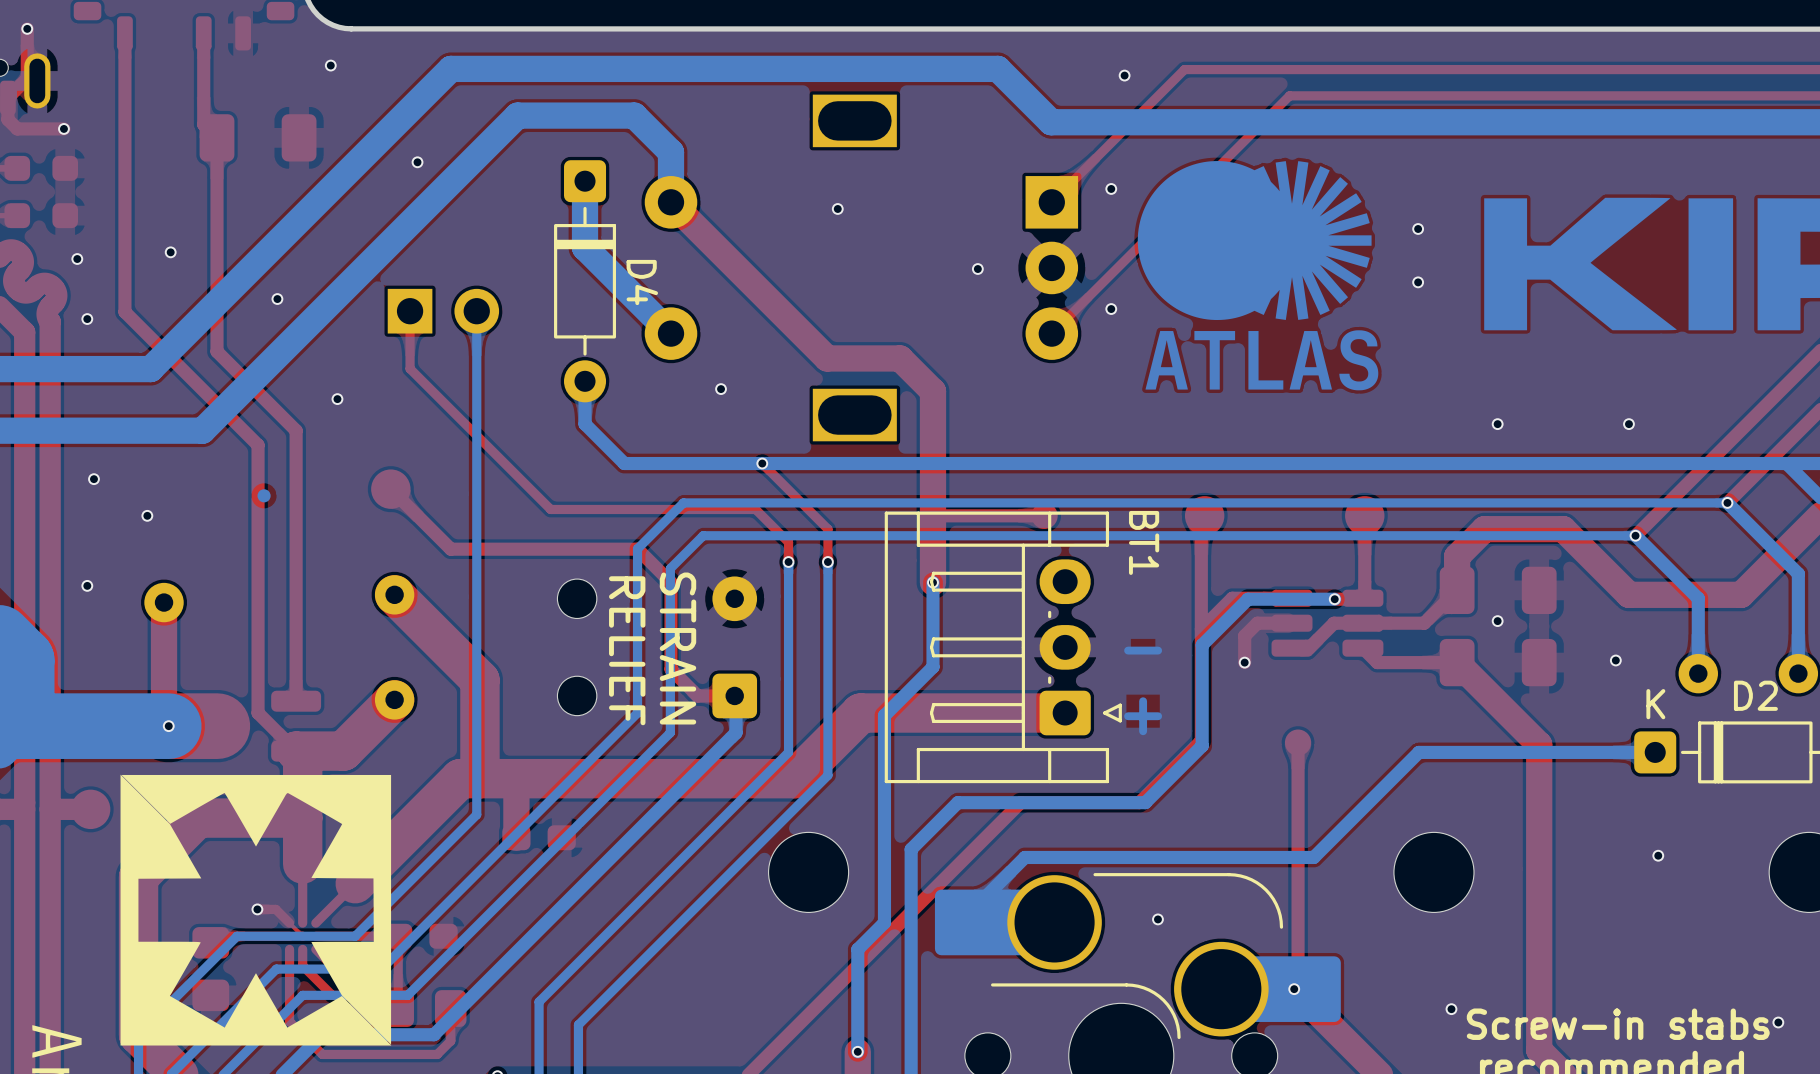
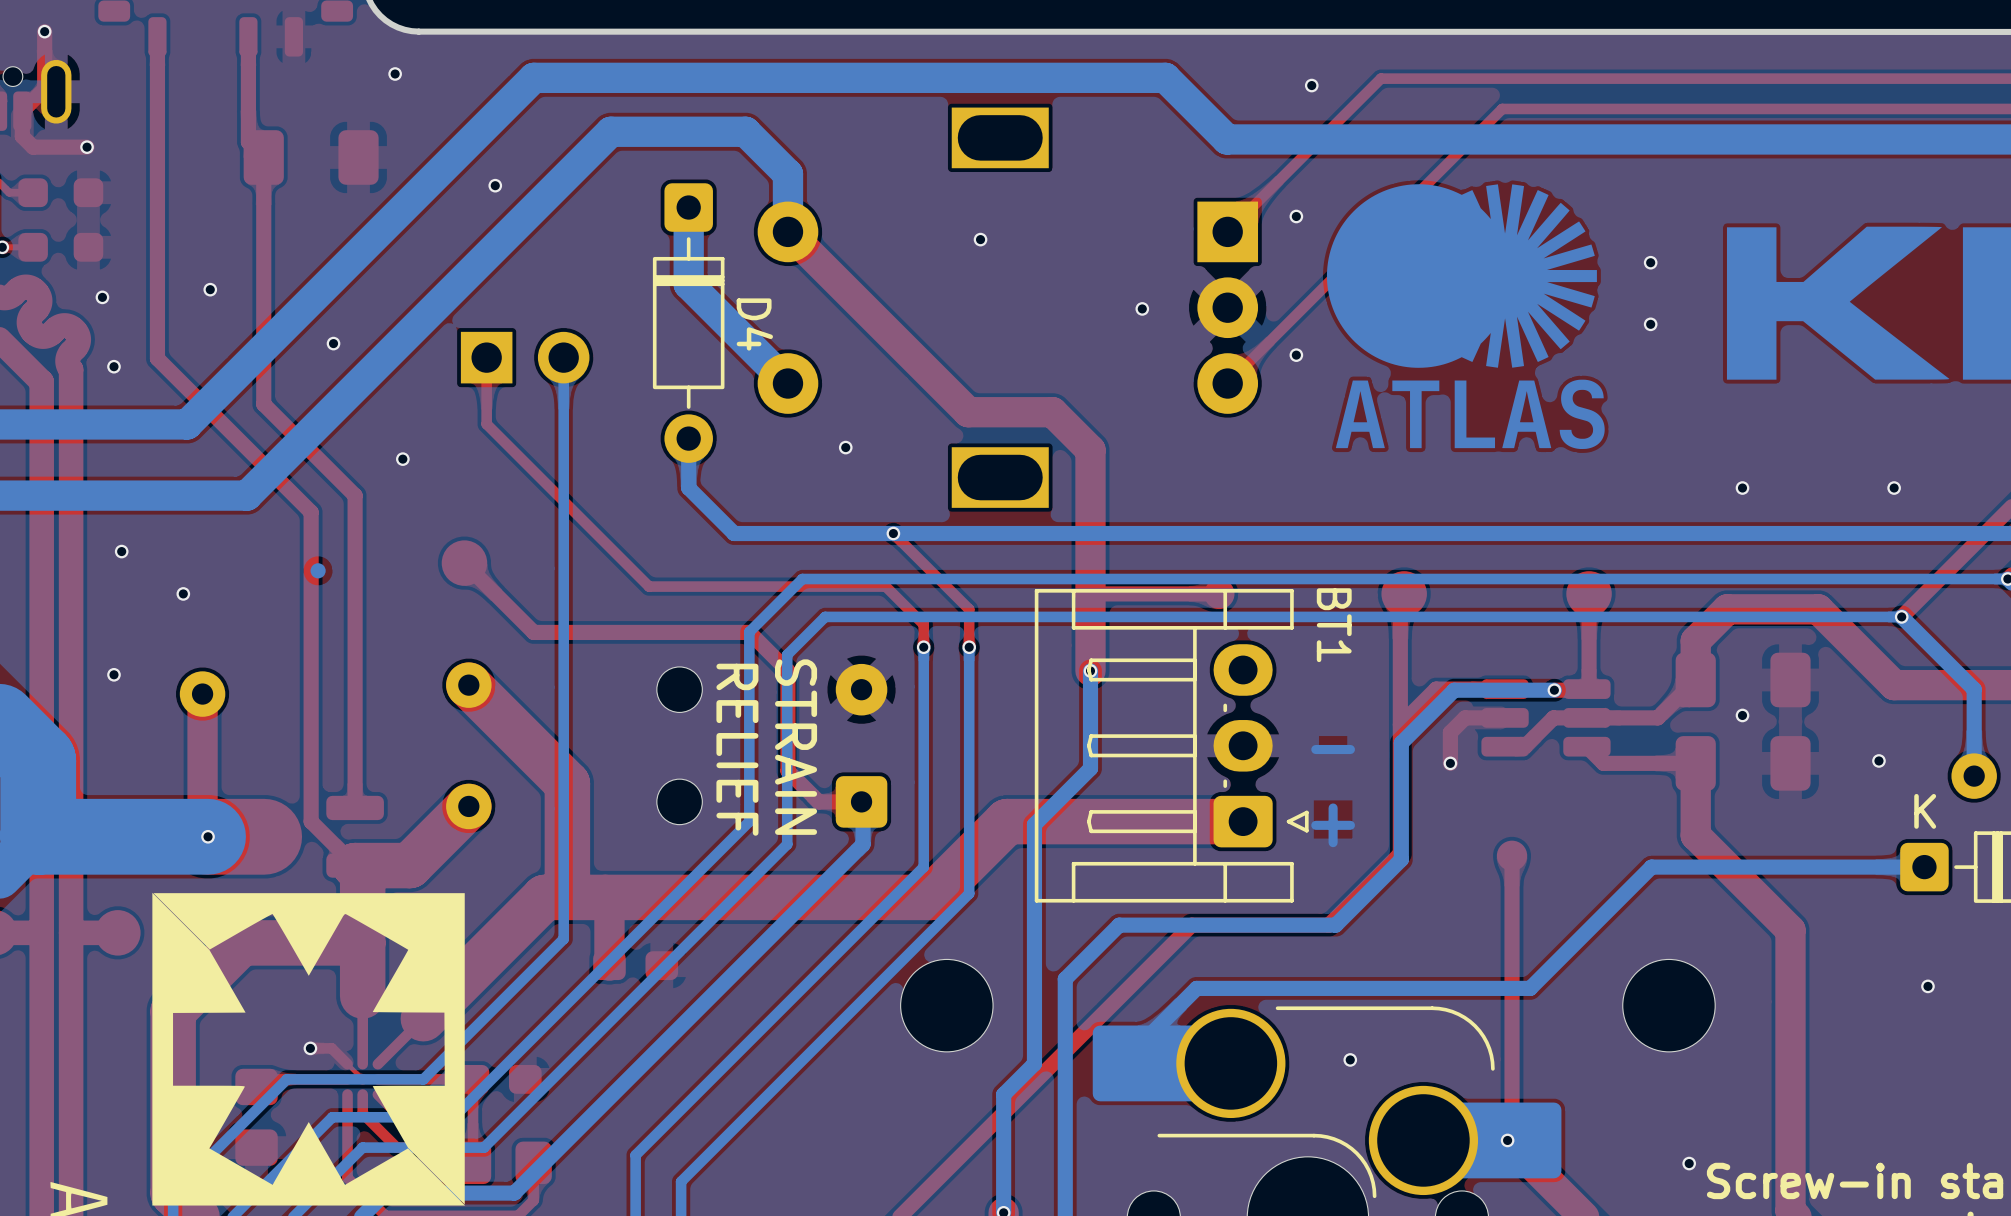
top track: (1457, 662) (1539, 744) (1539, 807) -> (1695, 763) (1695, 835) (1790, 930)

